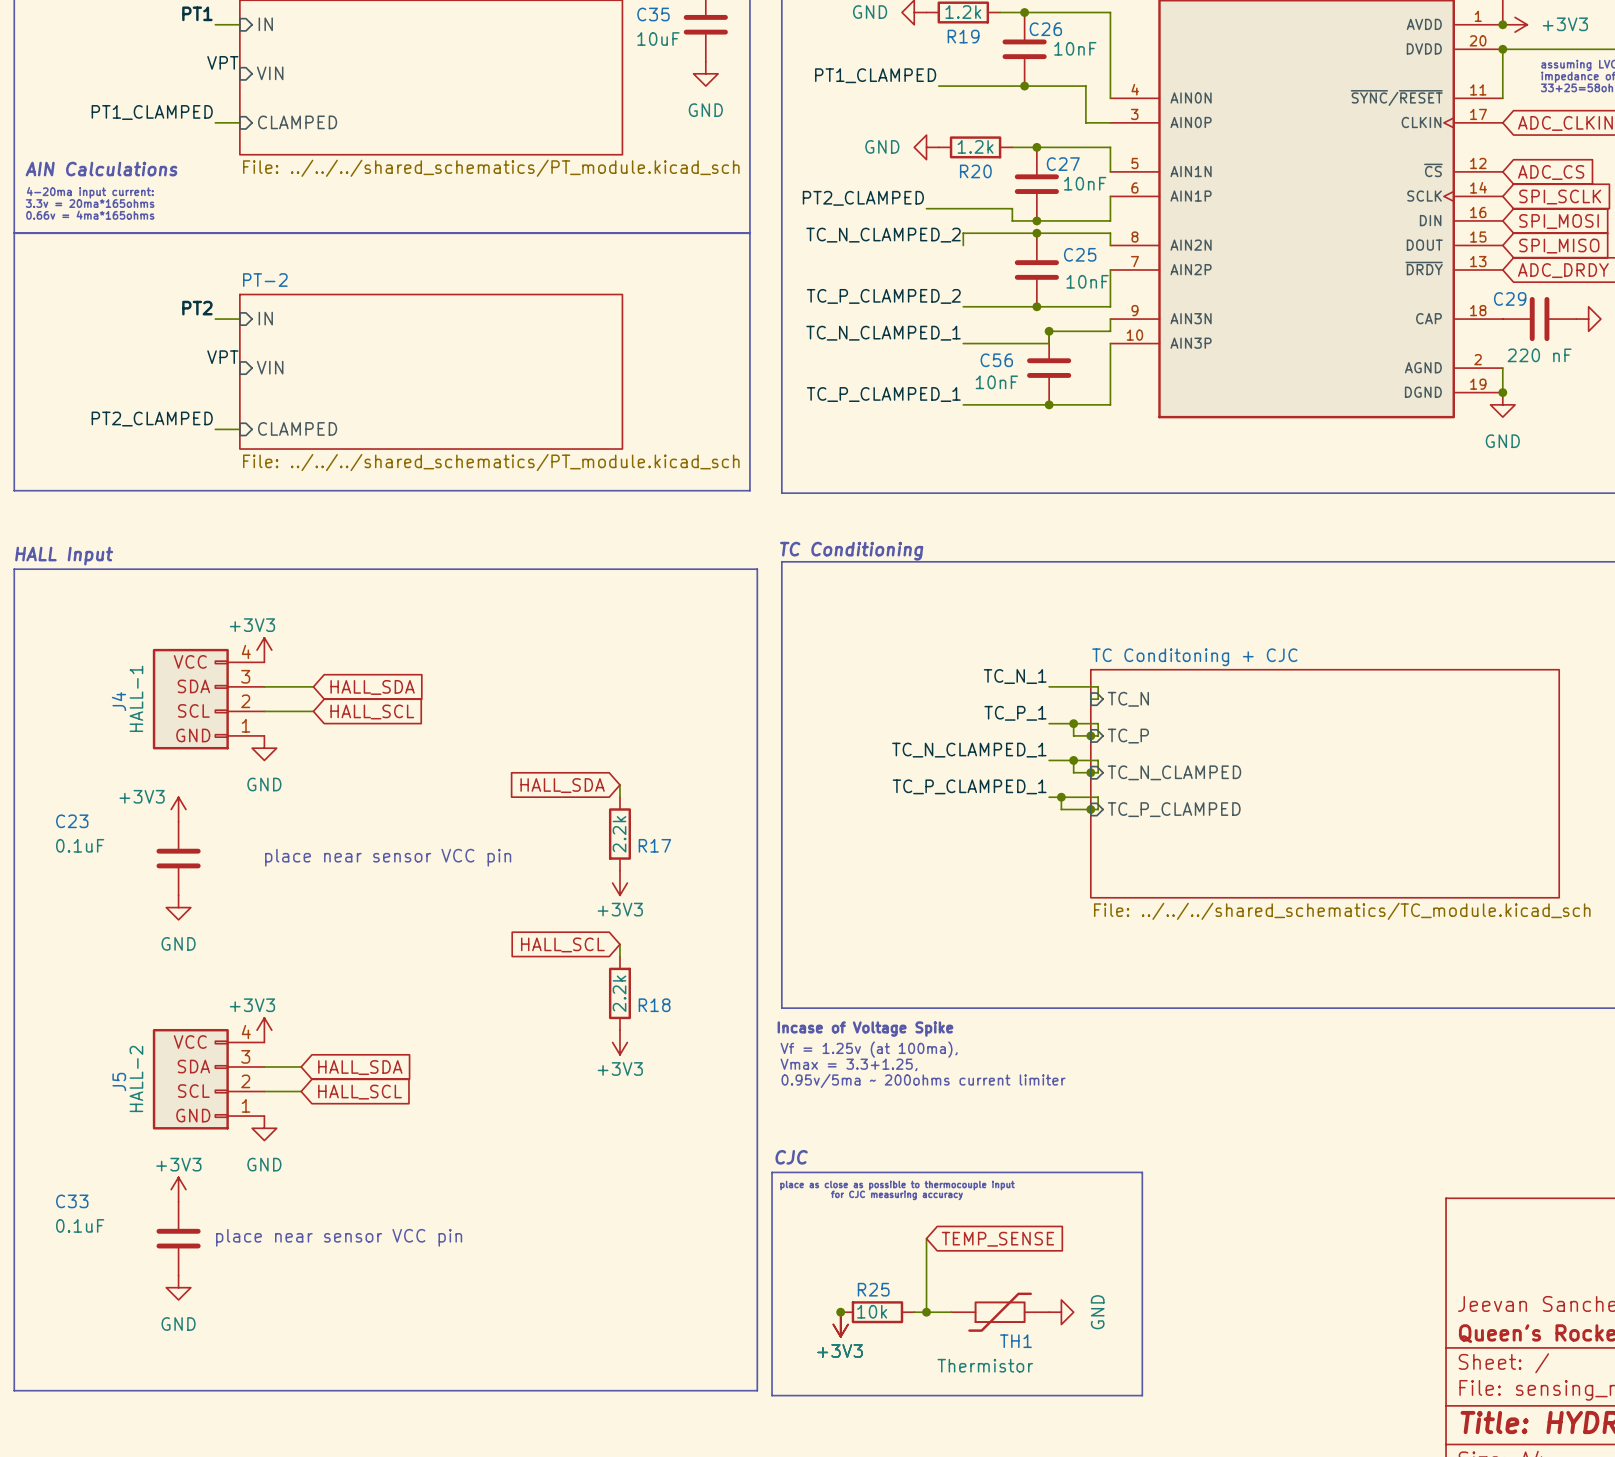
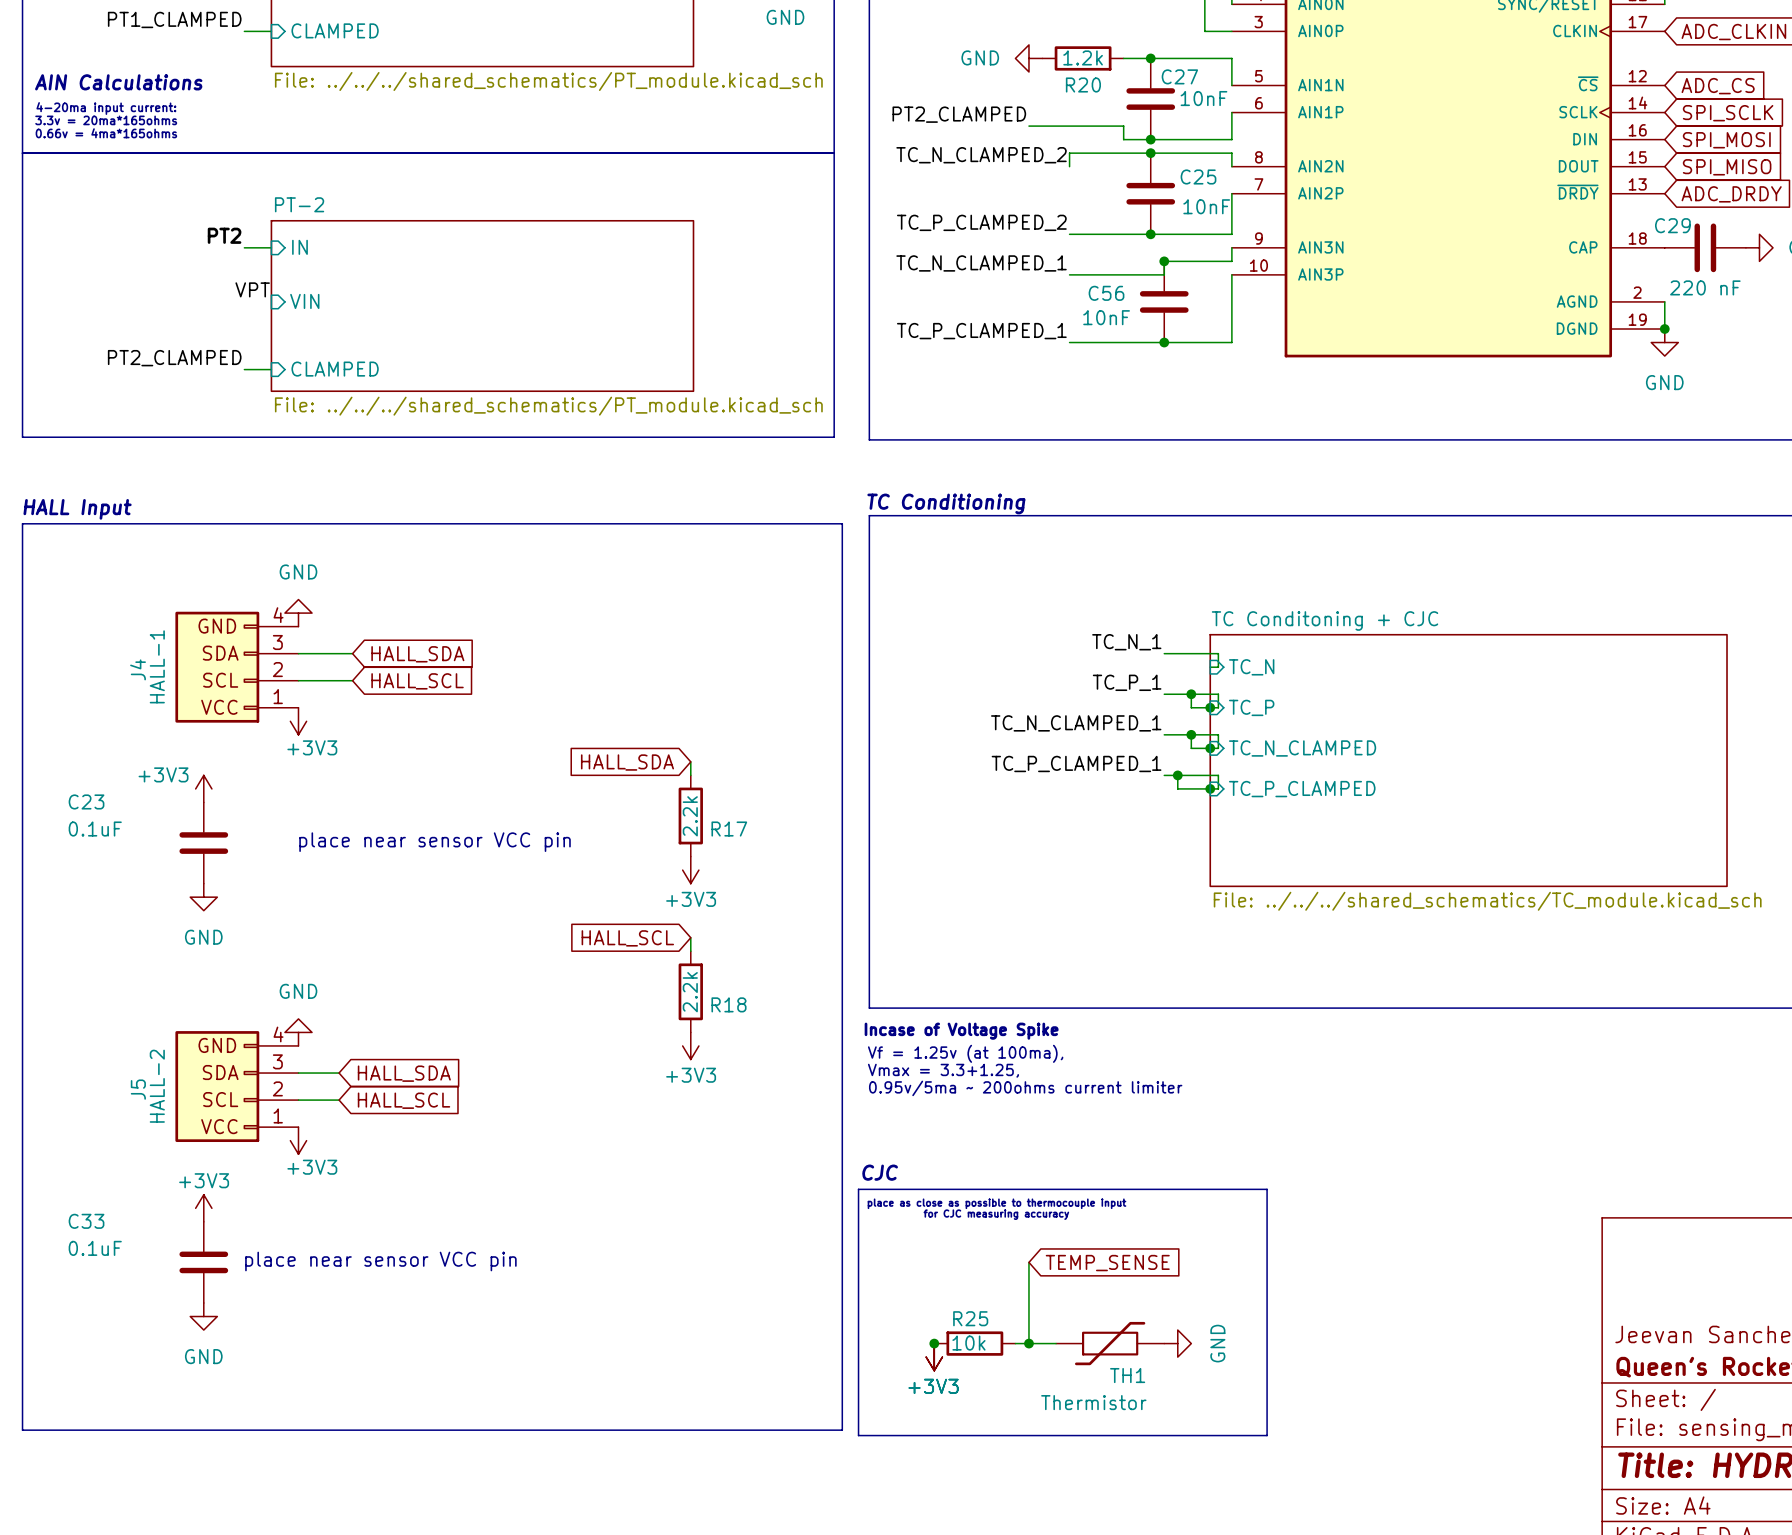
power symbol: +3V3 (264, 650) -> GND (298, 613)
J4 text: VCC (190, 661) -> GND (217, 626)
J4 text: GND (193, 735) -> VCC (219, 707)
power symbol: GND (264, 748) -> +3V3 (298, 721)
power symbol: +3V3 (264, 1030) -> GND (298, 1032)
J5 text: VCC (190, 1042) -> GND (217, 1045)
J5 text: GND (193, 1115) -> VCC (219, 1126)
power symbol: GND (264, 1128) -> +3V3 (298, 1140)

